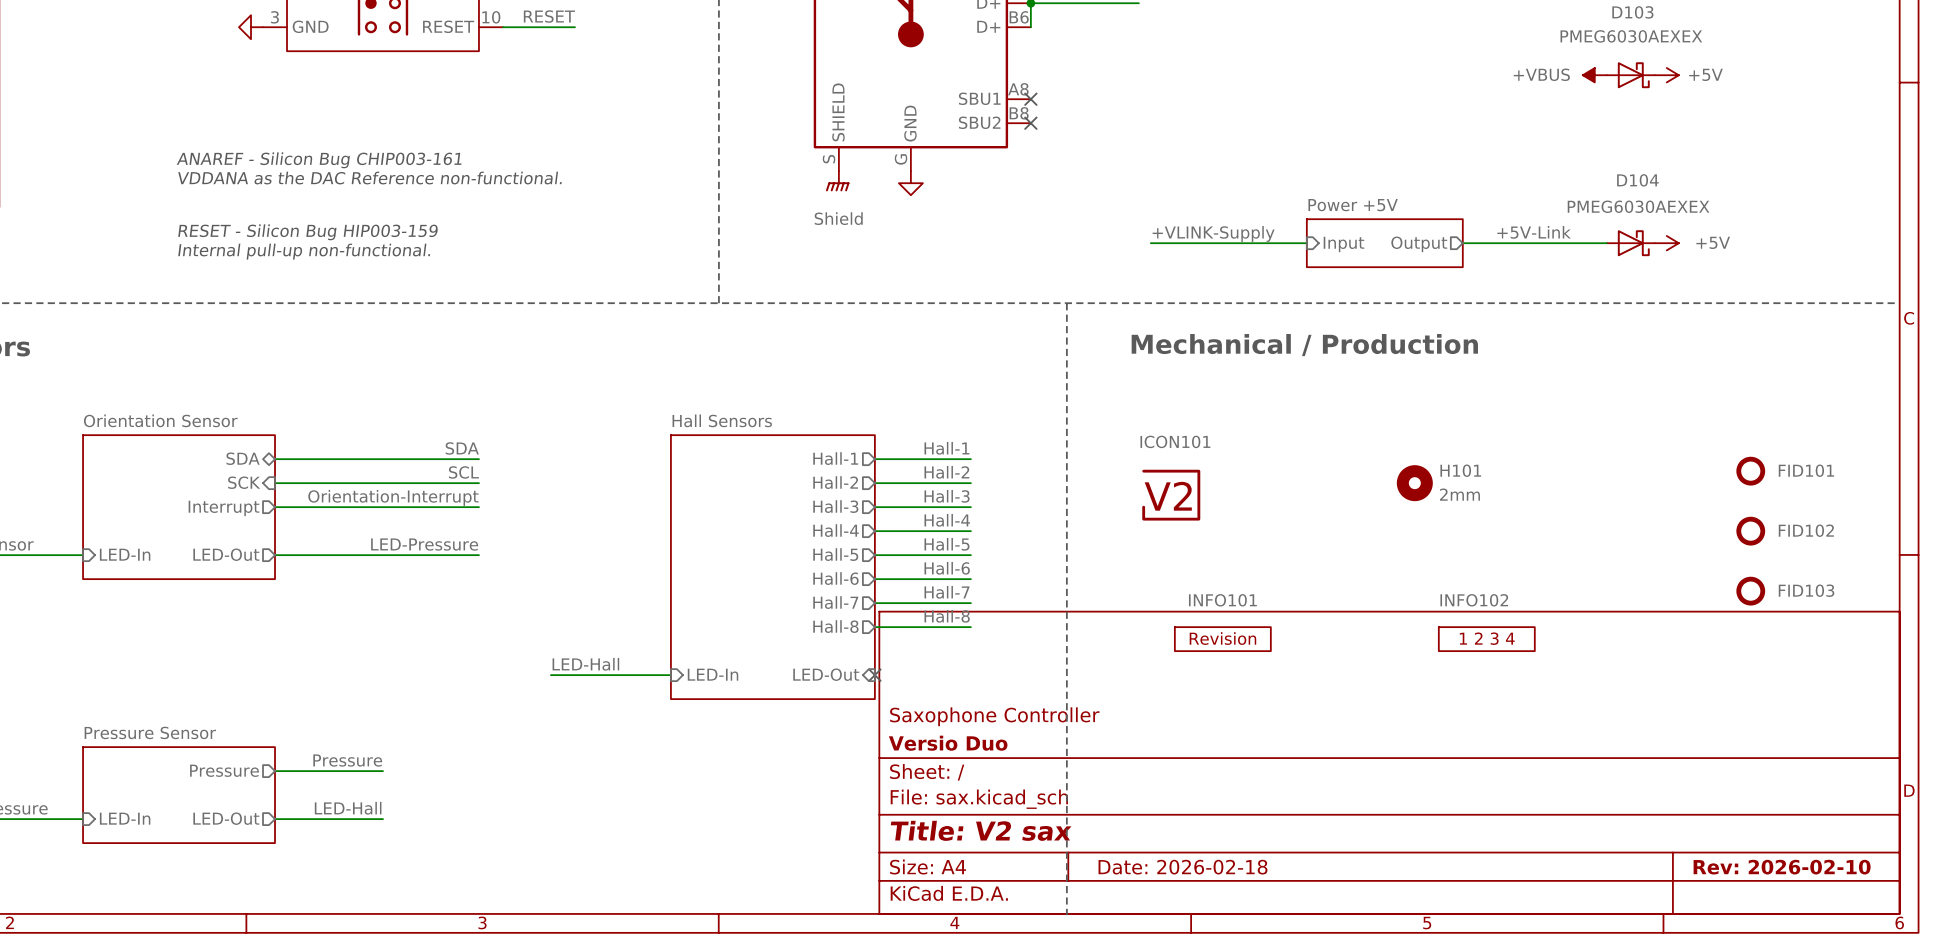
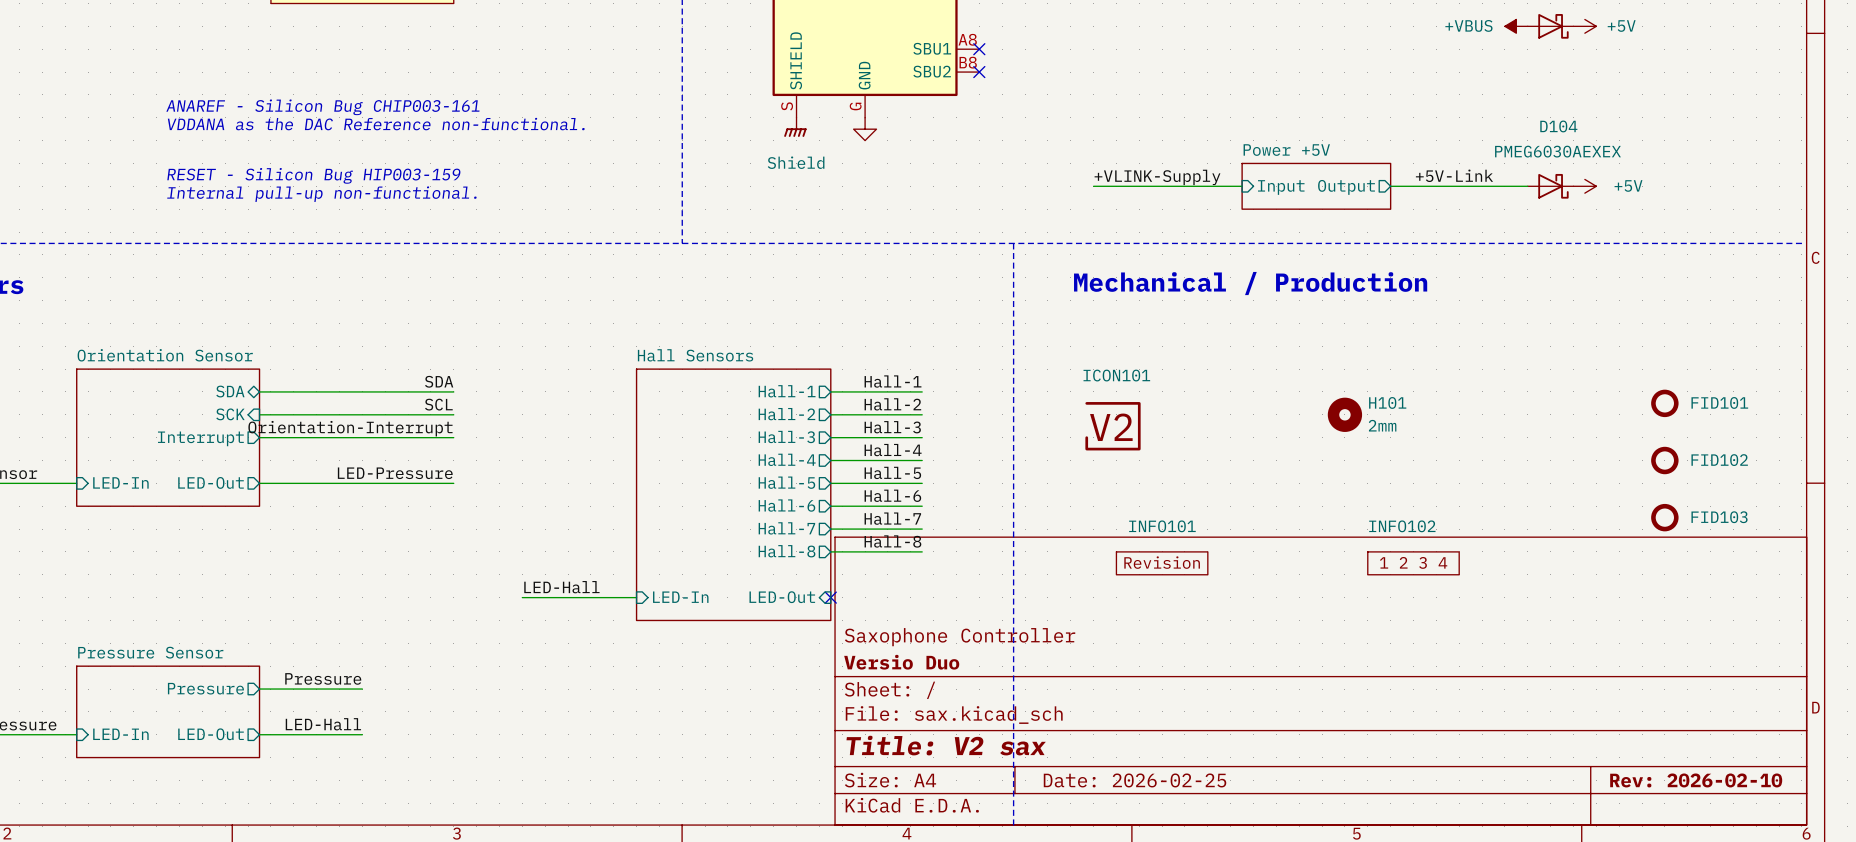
title block: Date: 2026-02-18 (1183, 867) -> Date: 2026-02-25 (1135, 780)

